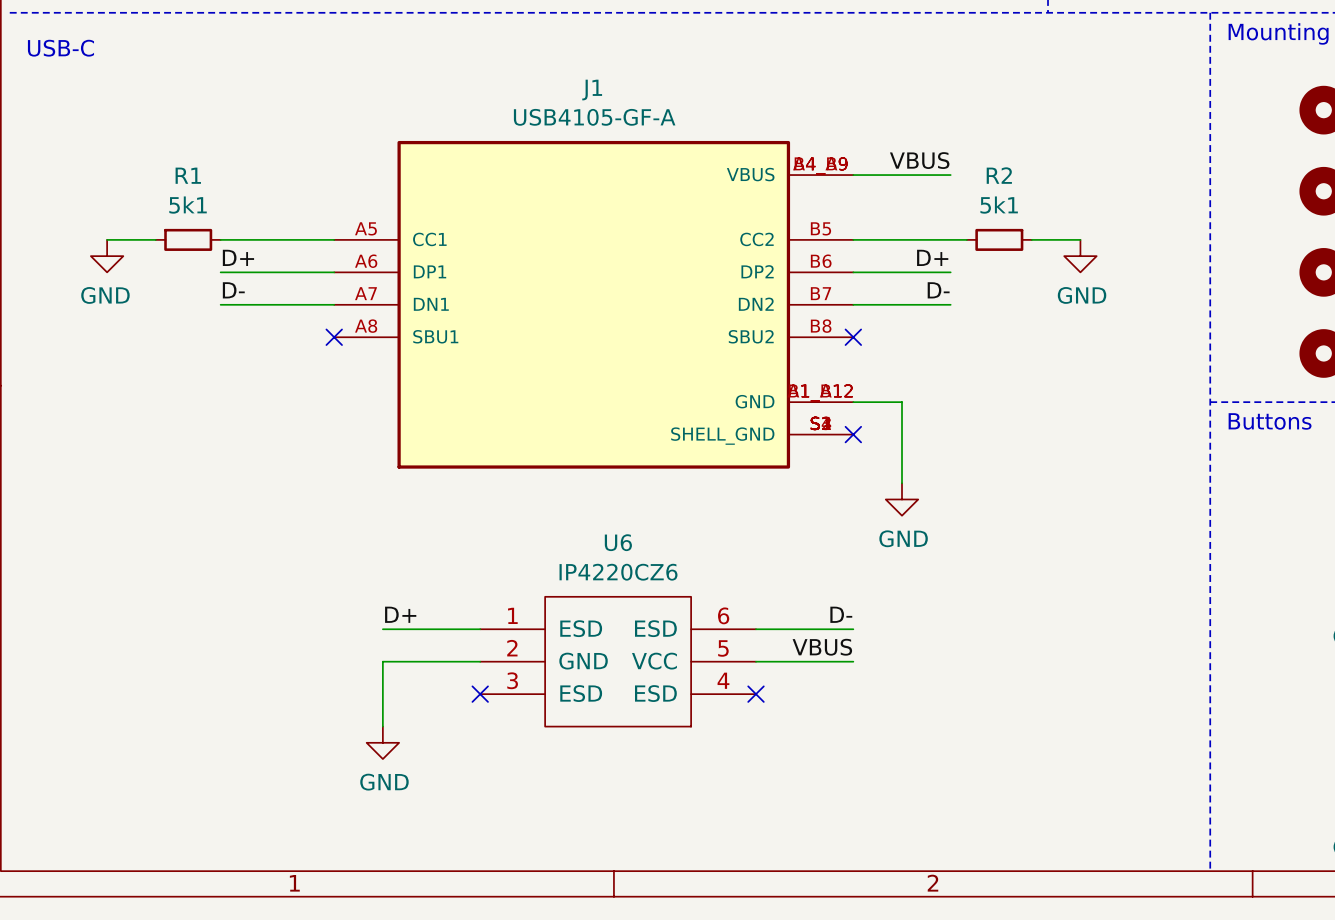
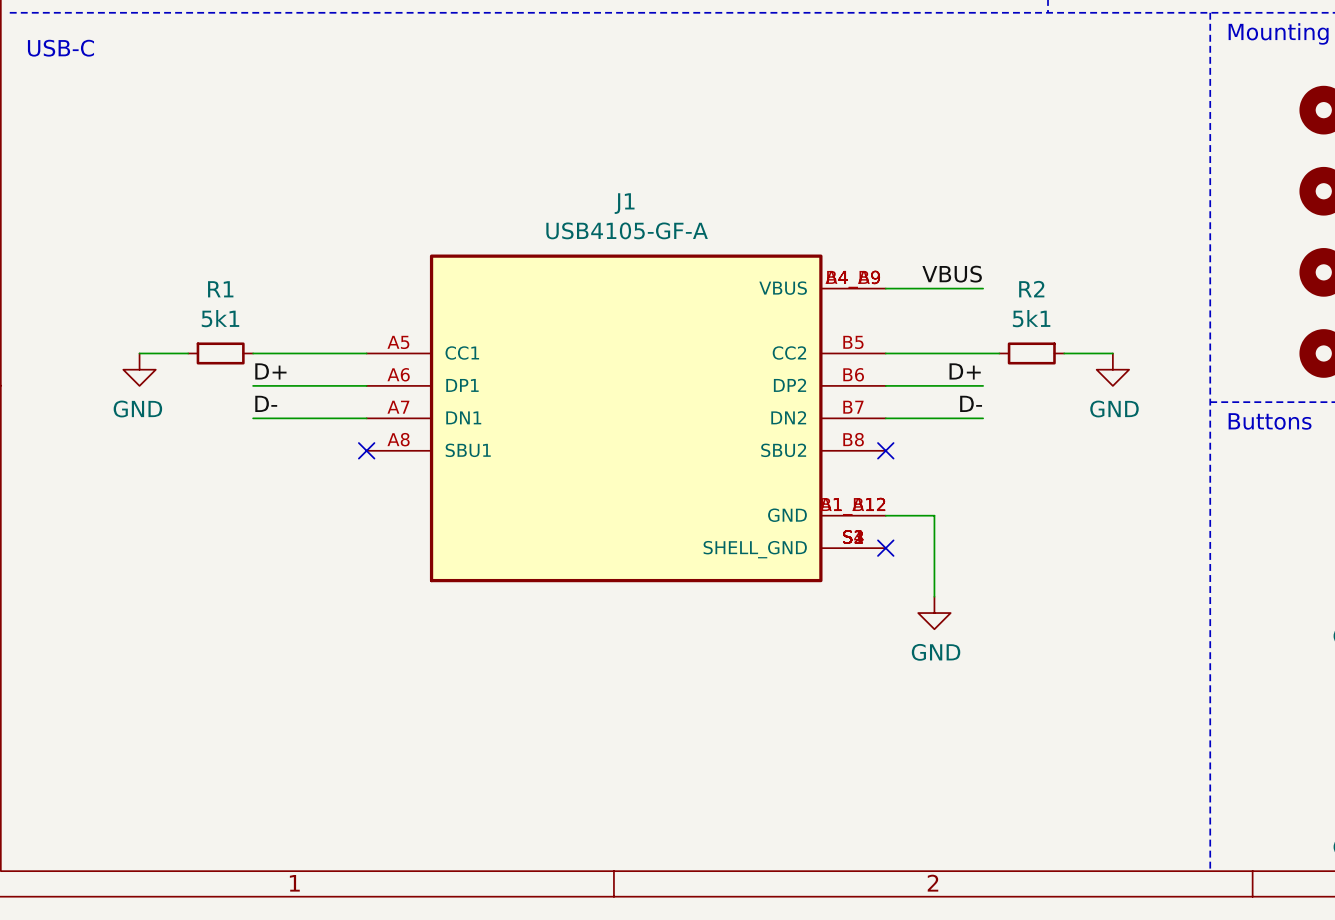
label position: VBUS (919, 160) -> VBUS (952, 274)
wire: (853, 175) (950, 175) -> (885, 288) (983, 288)
wire: (107, 239) (155, 239) -> (139, 353) (188, 353)
R1 position: (188, 239) -> (220, 353)
wire: (220, 239) (334, 239) -> (253, 353) (366, 353)
wire: (853, 239) (966, 239) -> (885, 353) (999, 353)
R2 position: (999, 239) -> (1031, 353)
wire: (1031, 239) (1080, 239) -> (1064, 353) (1112, 353)
power symbol position: GND (107, 256) -> GND (139, 369)
power symbol position: GND (1080, 256) -> GND (1112, 369)
label position: D+ (238, 257) -> D+ (270, 371)
label position: D+ (932, 257) -> D+ (965, 371)
wire: (220, 272) (334, 272) -> (253, 385) (366, 385)
wire: (853, 272) (950, 272) -> (885, 385) (983, 385)
label position: D- (233, 290) -> D- (266, 403)
label position: D- (938, 290) -> D- (971, 403)
wire: (220, 304) (334, 304) -> (253, 418) (366, 418)
J1 position: (593, 304) -> (626, 418)
wire: (853, 304) (950, 304) -> (885, 418) (983, 418)
no-connect mark: (334, 337) -> none
no-connect mark: (853, 337) -> none
wire: (853, 402) (902, 402) (902, 483) -> (885, 515) (934, 515) (934, 596)
no-connect mark position: (853, 434) -> (885, 450)
no-connect mark: none -> (366, 450)
power symbol position: GND (902, 499) -> GND (934, 613)
no-connect mark: none -> (885, 548)
label: D+ (400, 614) -> none
label: D- (841, 614) -> none
wire: (382, 629) (480, 629) -> none
wire: (756, 629) (853, 629) -> none
label: VBUS (822, 647) -> none
wire: (480, 661) (382, 661) (382, 726) -> none
U6: IP4220CZ6 (618, 661) -> none
wire: (756, 661) (853, 661) -> none
no-connect mark: (480, 694) -> none
no-connect mark: (756, 694) -> none
power symbol: GND (382, 742) -> none

